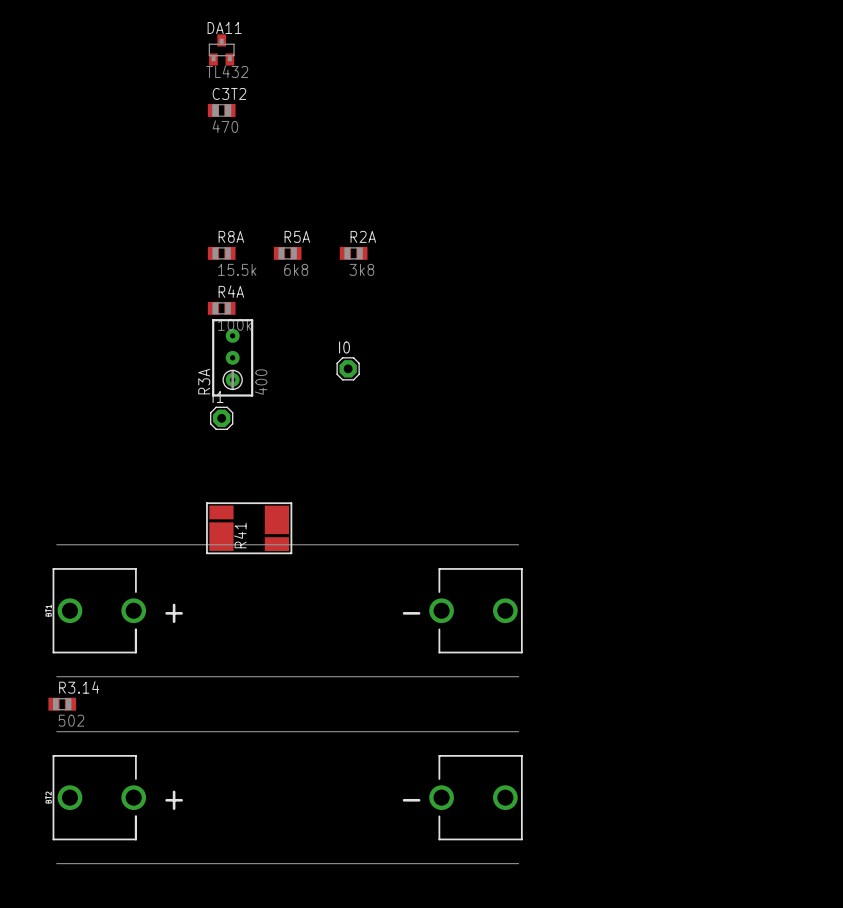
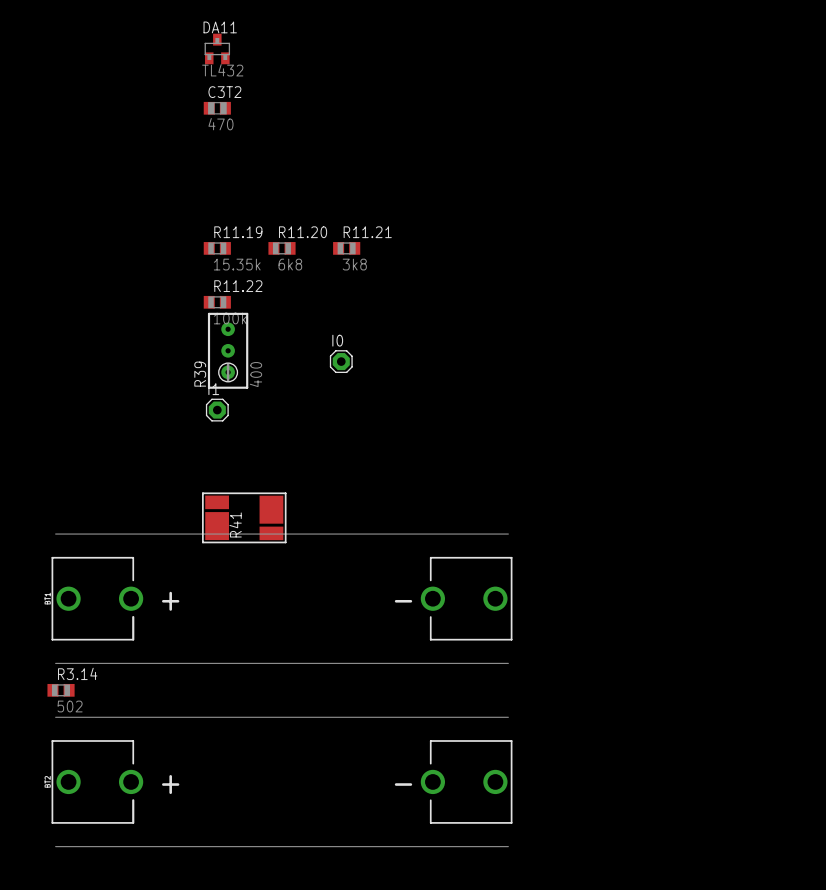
R8A name: R8A (231, 236) -> R11.19 (238, 232)
R5A name: R5A (297, 236) -> R11.20 (303, 232)
R2A name: R2A (363, 236) -> R11.21 (367, 232)
R8A value: 15.5k (237, 269) -> 15.35k (237, 264)
R4A name: R4A (231, 291) -> R11.22 (238, 286)
R3A name: R3A (204, 381) -> R39 (200, 374)

